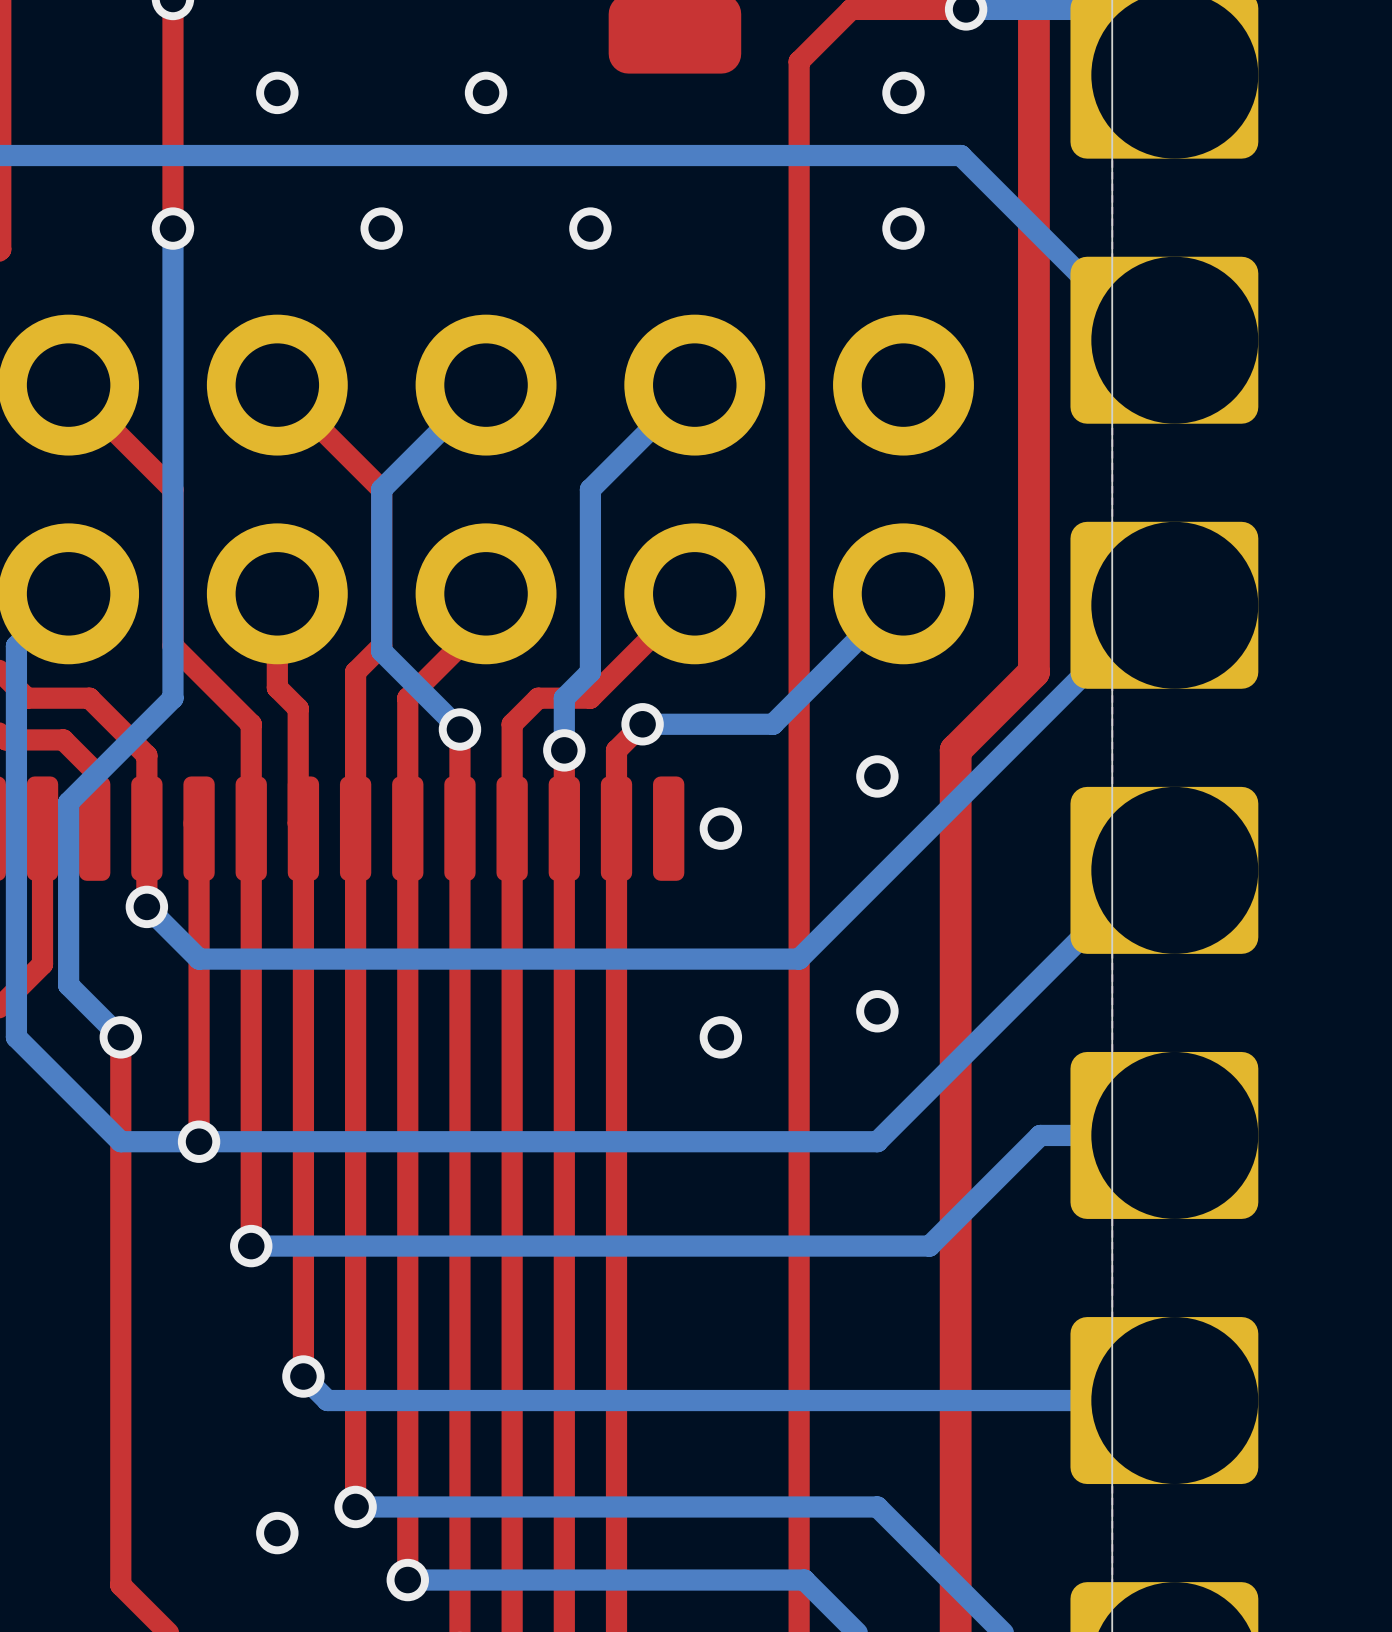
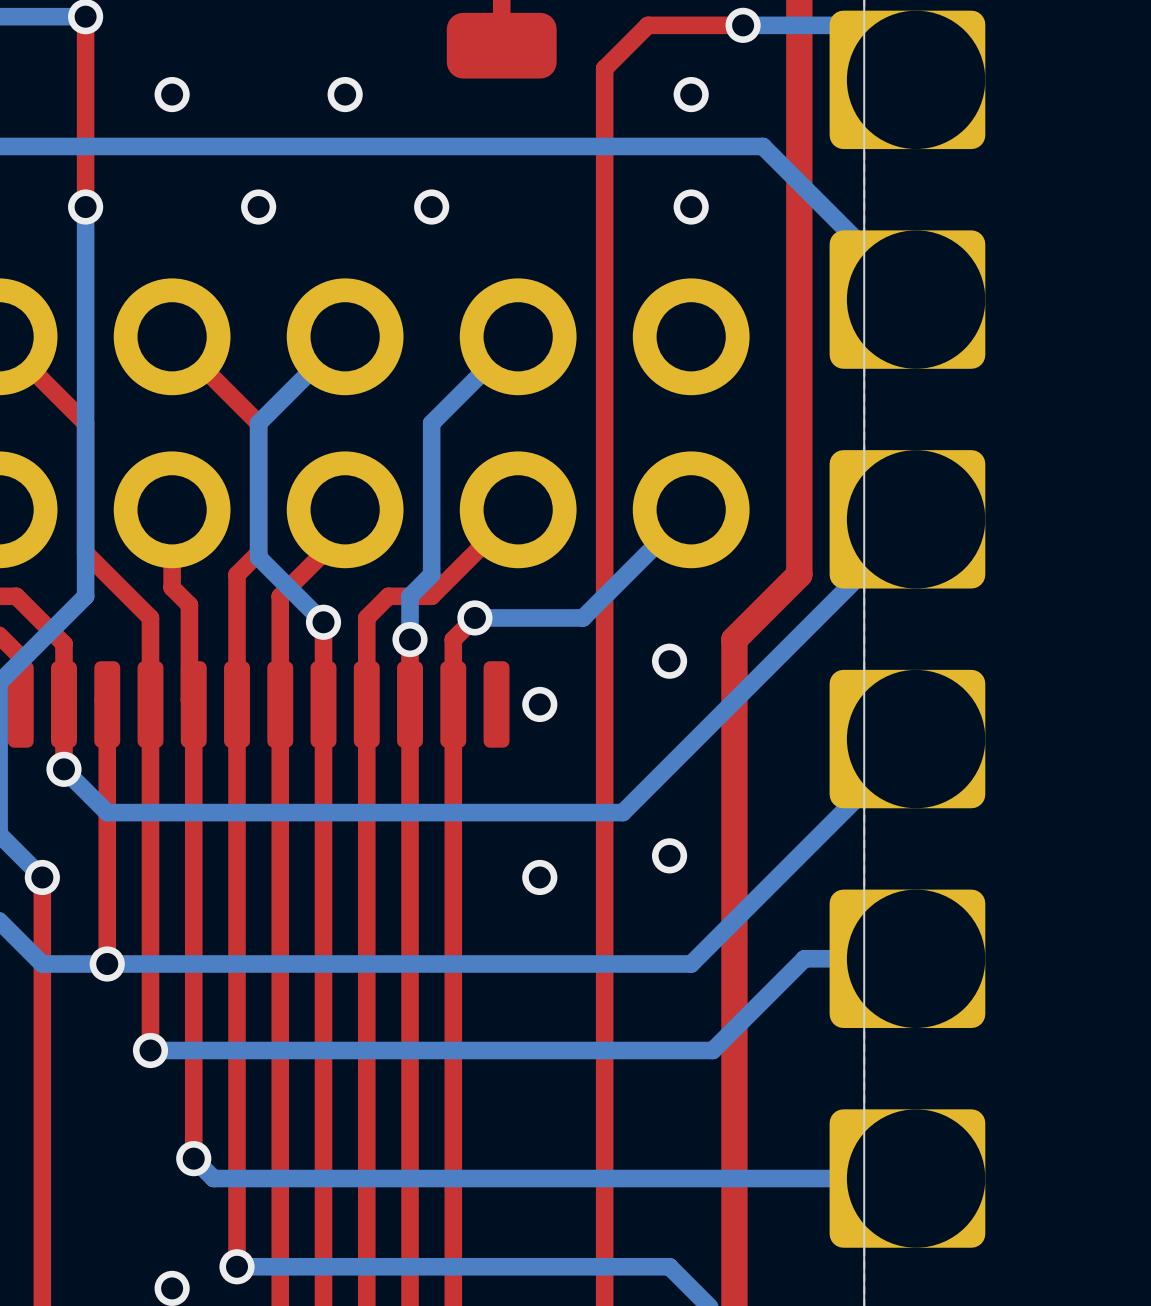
bottom track: (960, 155) (1145, 340) (1174, 340) -> (738, 146) (762, 146) (916, 299)
bottom track: (1174, 605) (1152, 605) (799, 959) -> (916, 519) (622, 812) (604, 812)
bottom track: (1174, 870) (1148, 870) (877, 1141) -> (916, 739) (691, 963) (669, 963)

